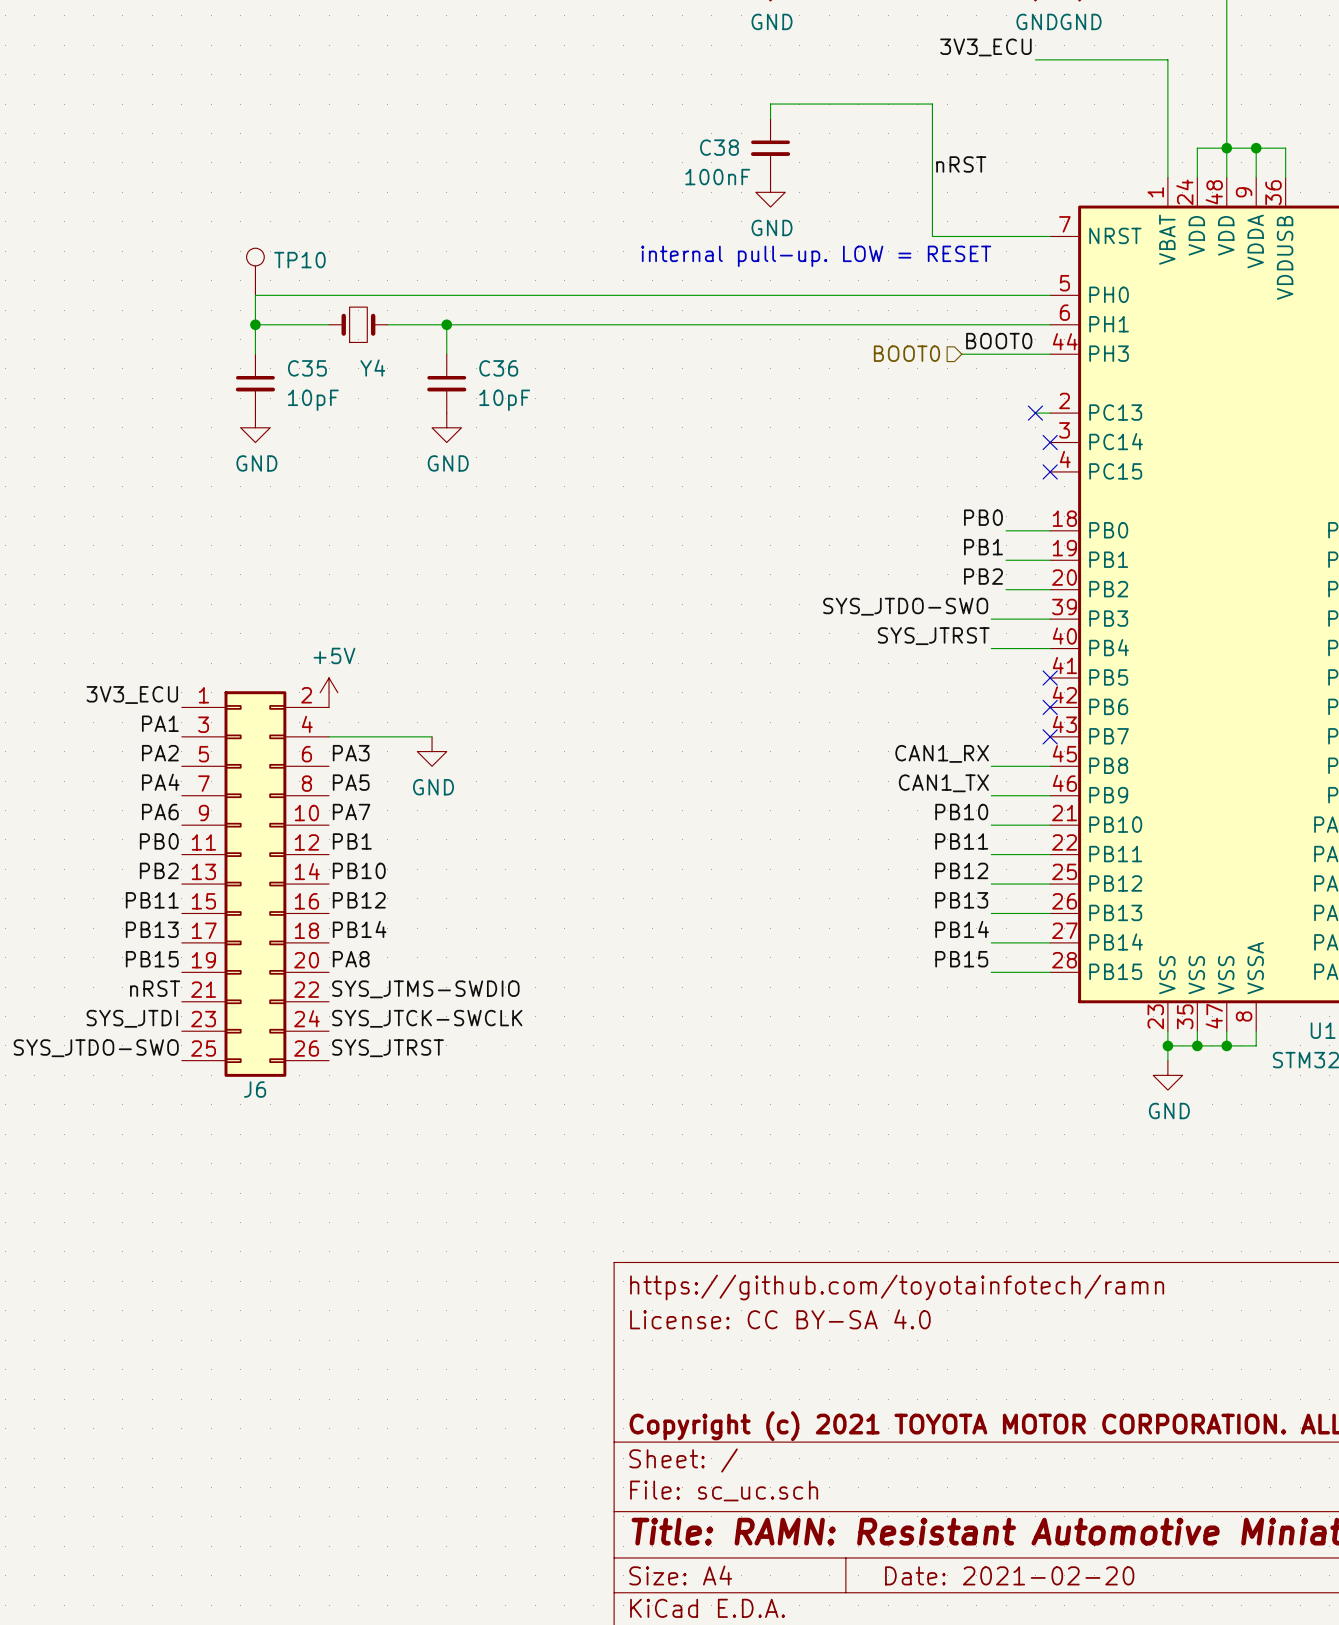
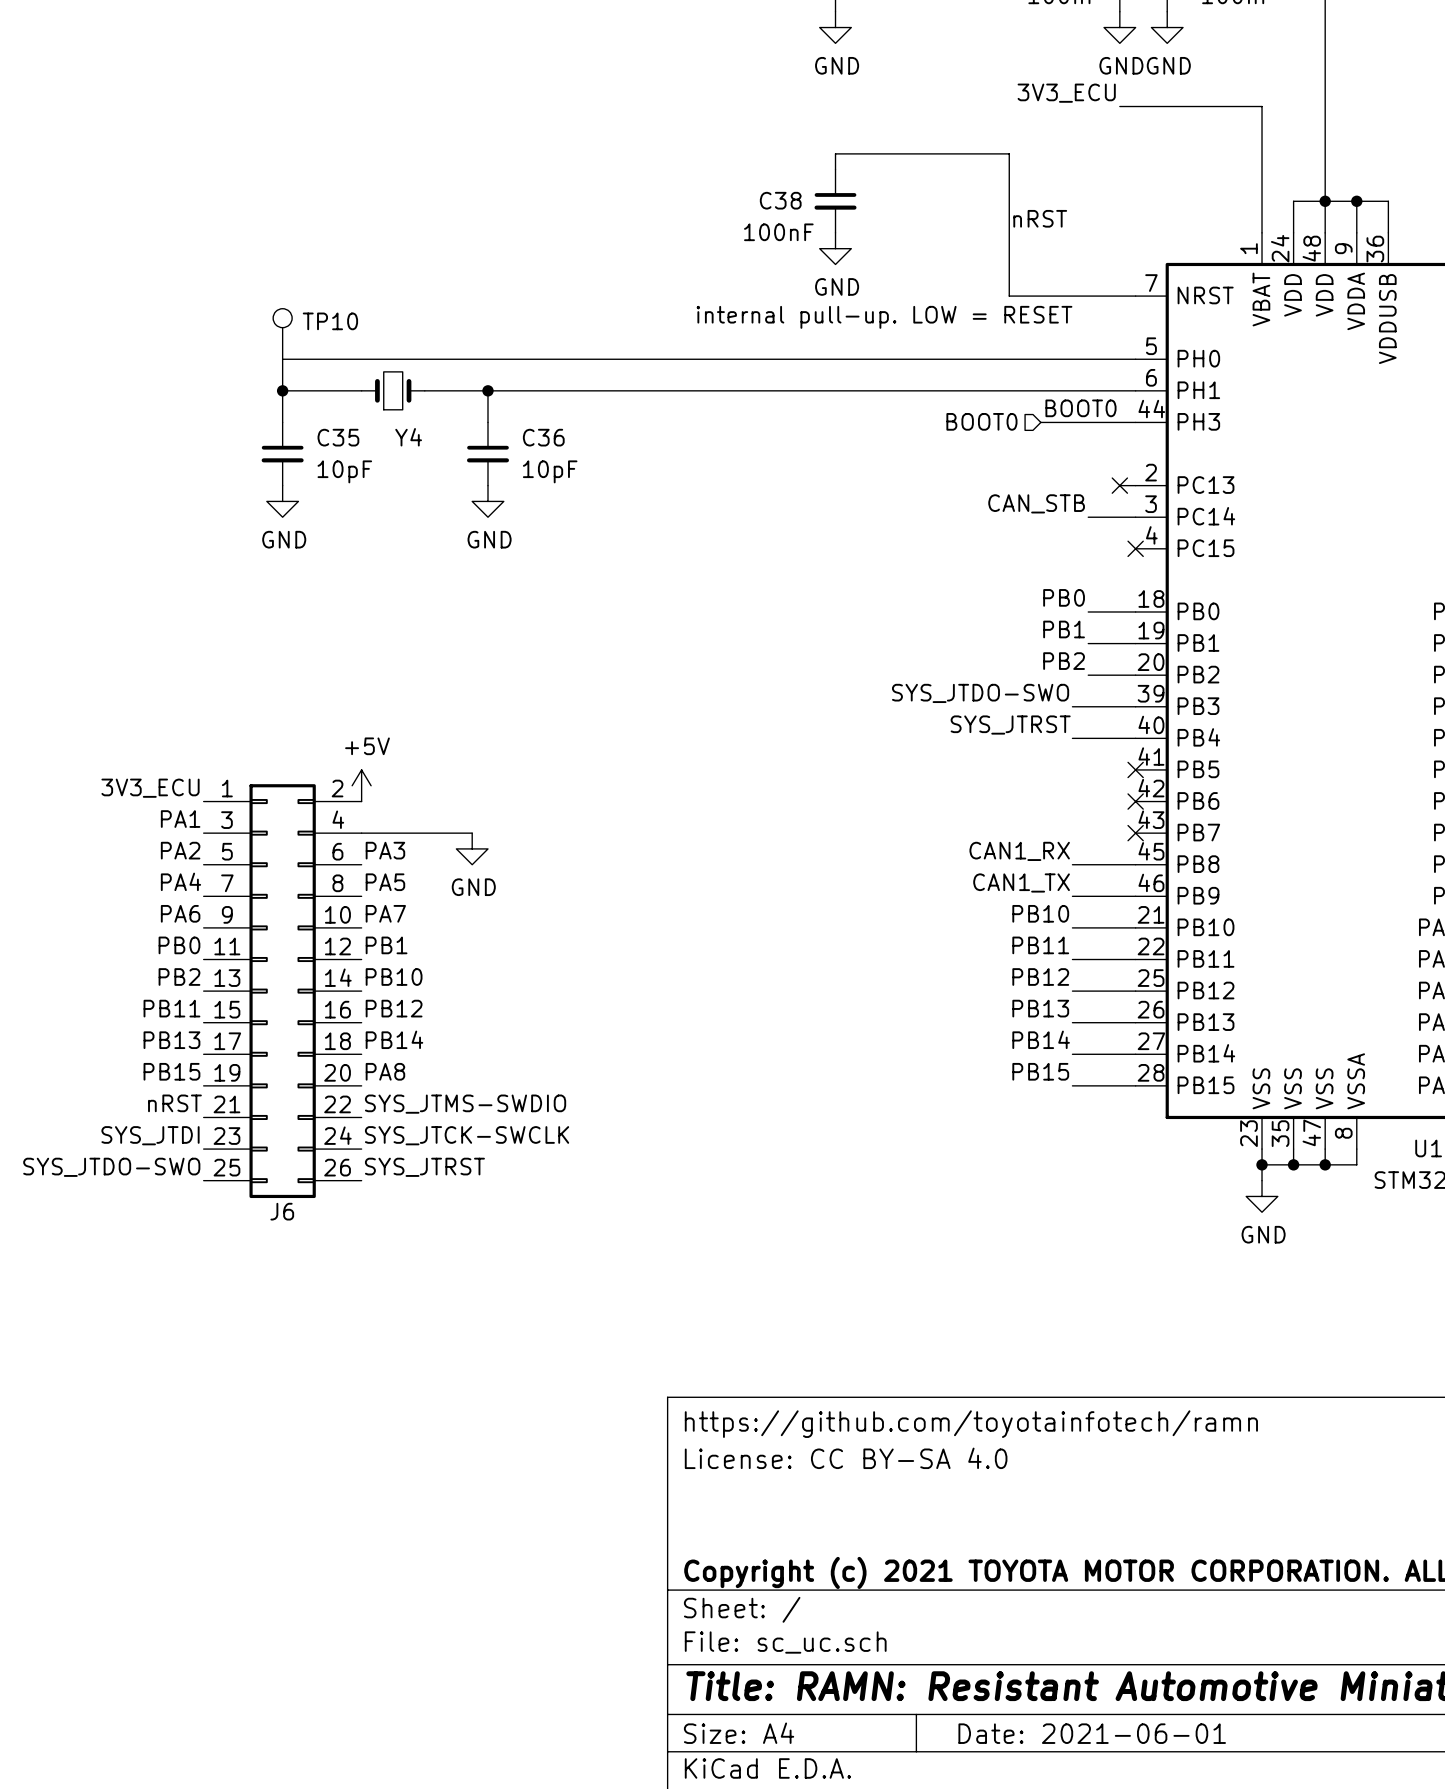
label: none -> CAN_STB (1036, 503)
wire: none -> (1088, 517) (1135, 517)
no-connect mark: (1050, 442) -> none
title block: Date: 2021-02-20 (1009, 1575) -> Date: 2021-06-01 (1092, 1733)

